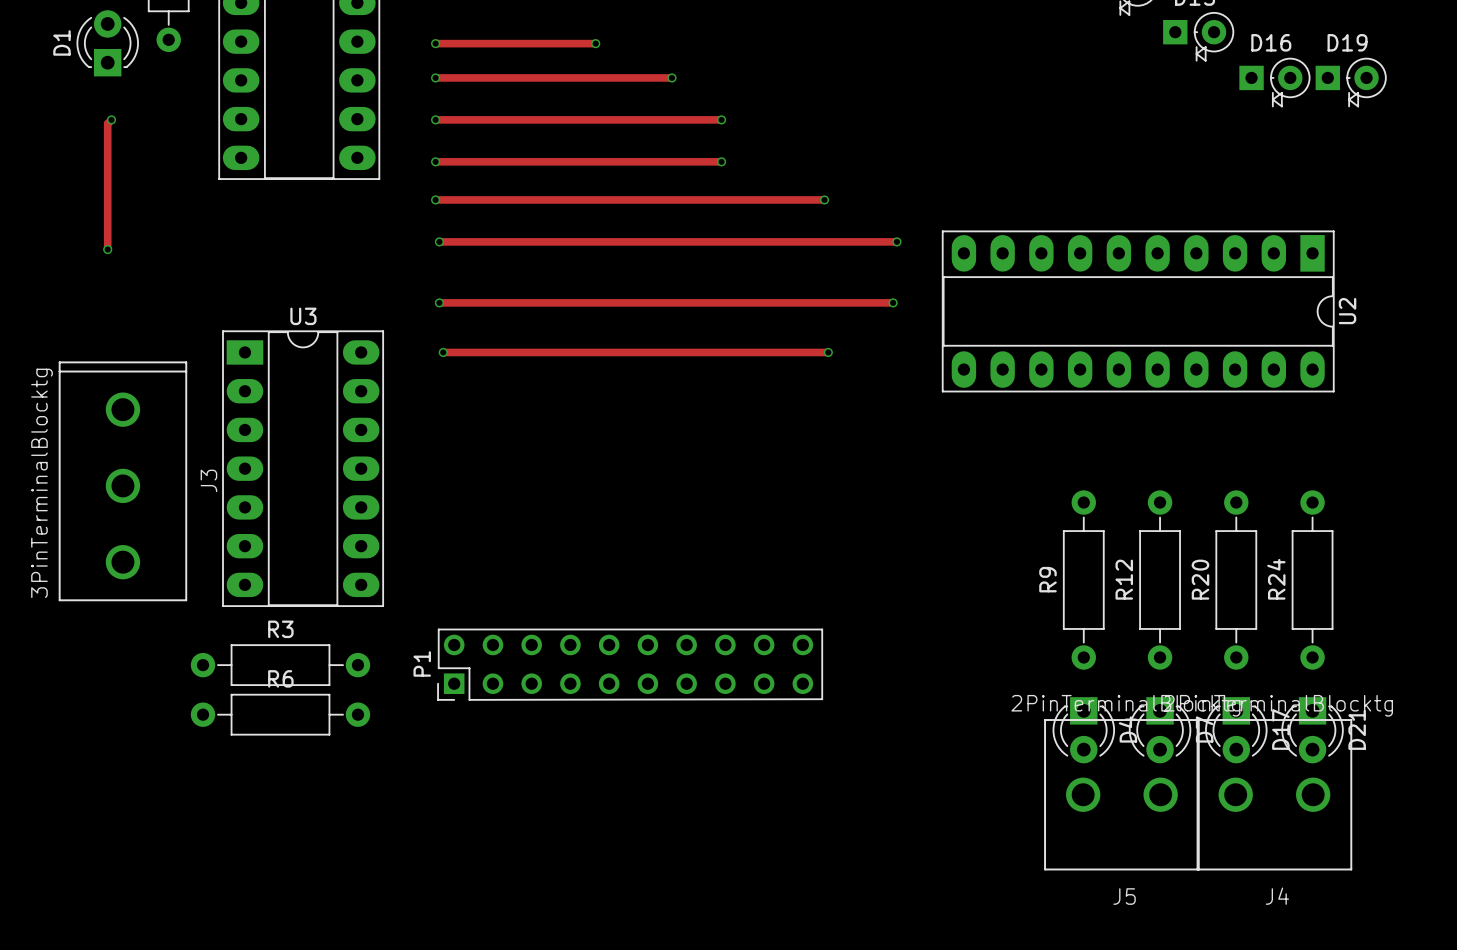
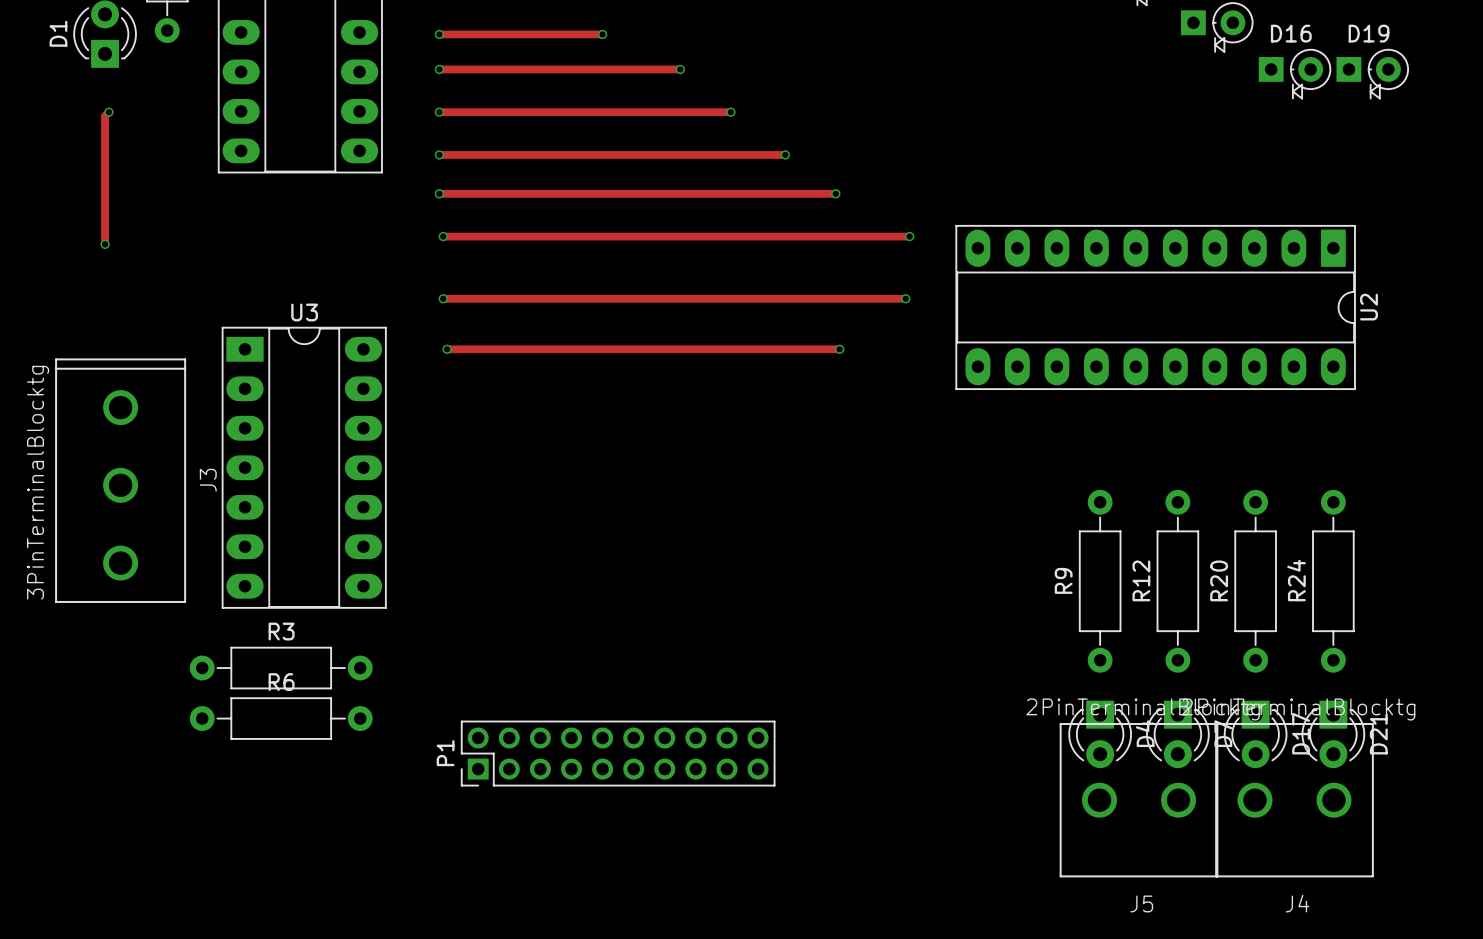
track: none -> (730, 154) (785, 154)
via position: (721, 161) -> (785, 154)
P1 footprint: [437, 628, 824, 701] -> [460, 720, 776, 787]
P1 name position: P1 (422, 663) -> P1 (445, 753)

